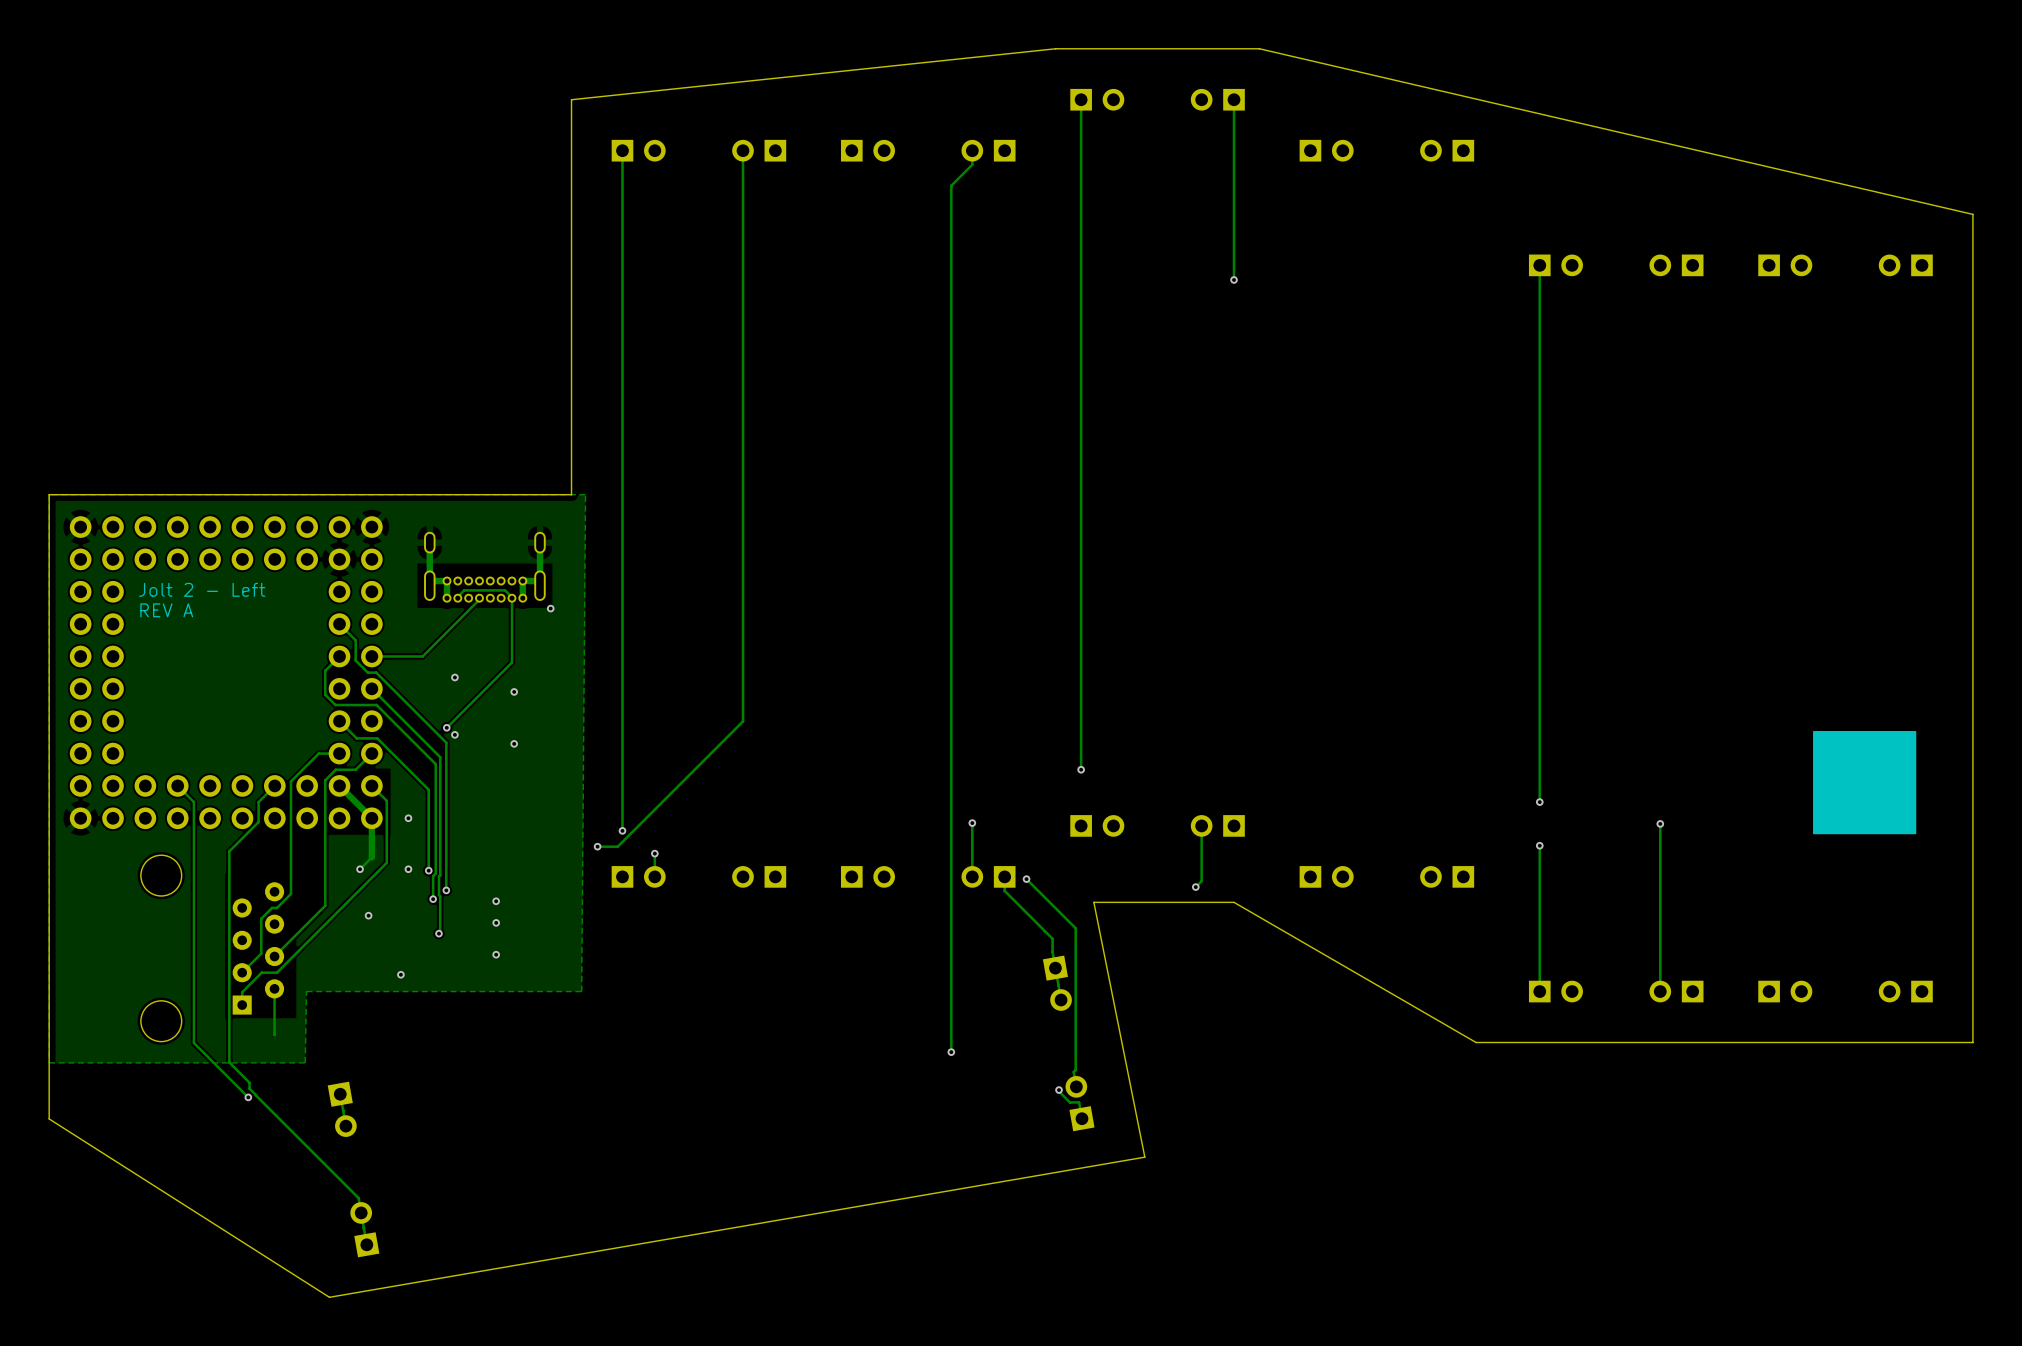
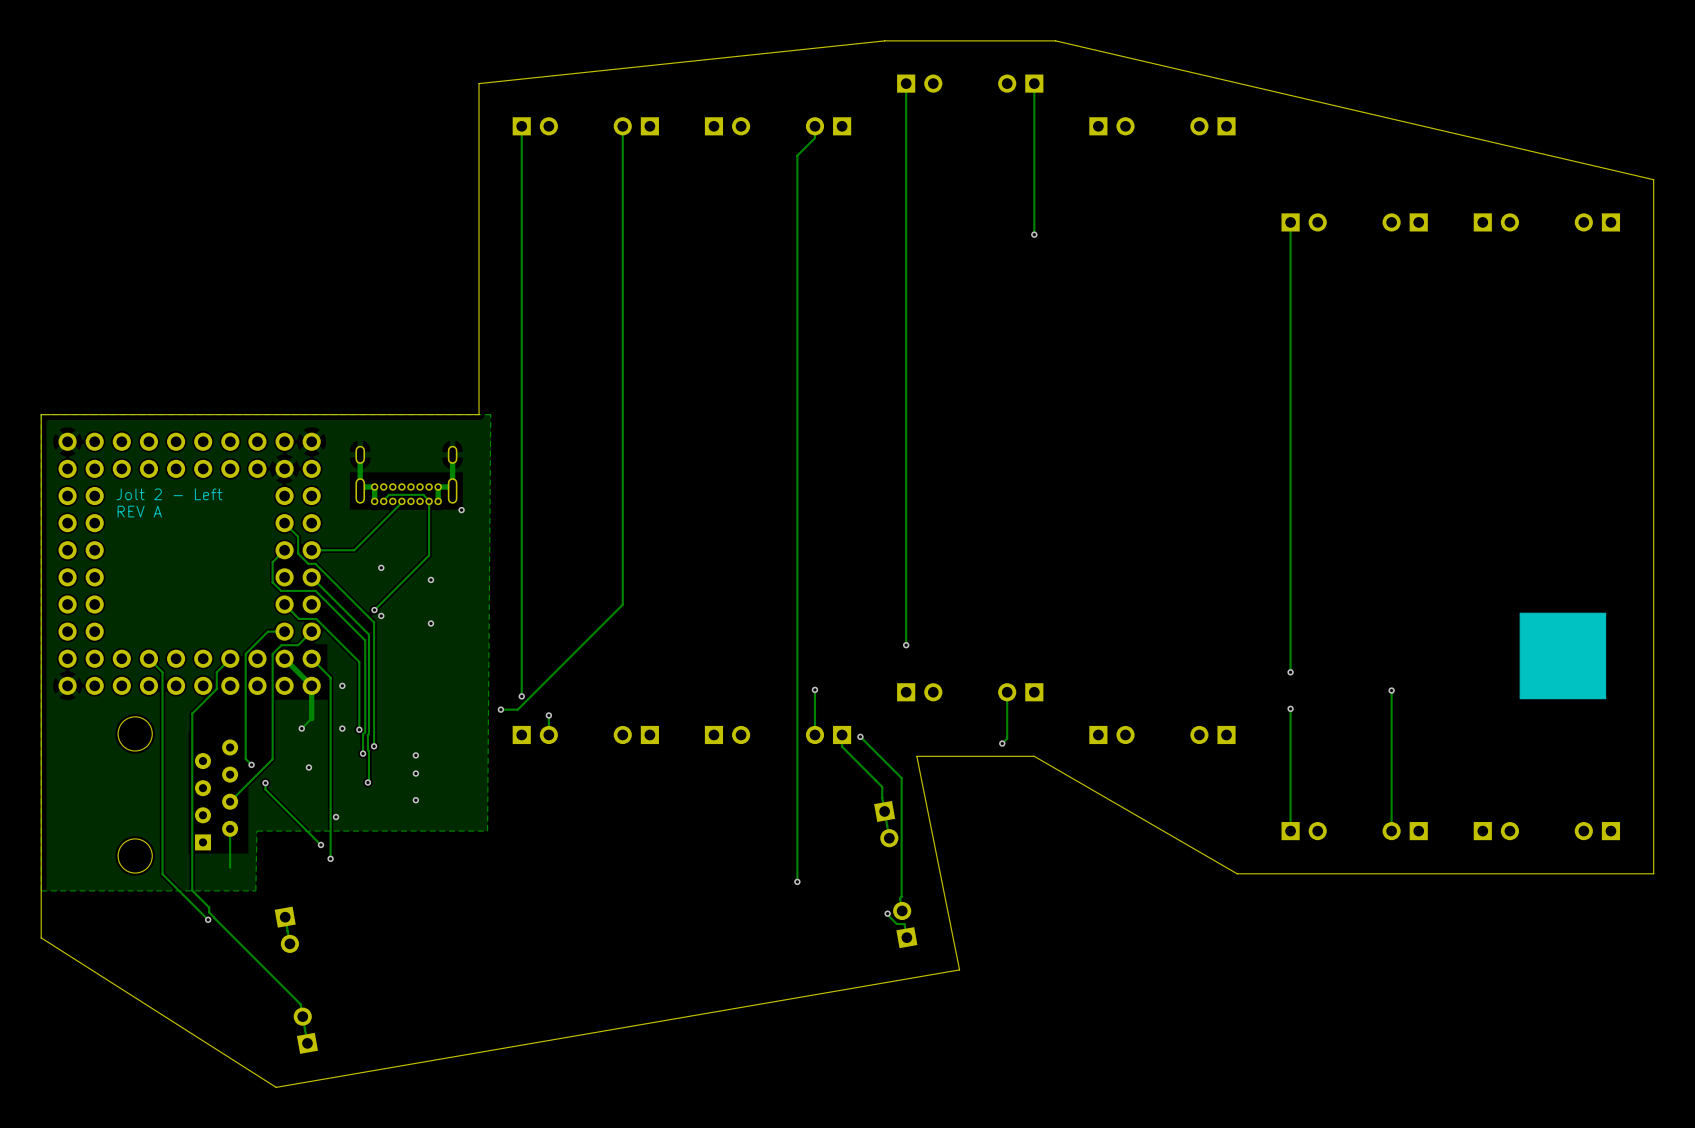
track: (319, 753) (290, 781) (290, 894) (277, 907) (272, 907) (261, 918) (261, 953) (242, 972) -> (267, 631) (245, 653) (245, 759) (251, 764)
track: (386, 800) (386, 862) (276, 972) (261, 972) (242, 992) (242, 1005) -> (324, 671) (330, 677) (330, 858)
via: none -> (251, 764)
track: none -> (265, 783) (265, 789) (320, 844)
via: none -> (265, 783)
via: none -> (320, 844)
via: none -> (330, 858)

